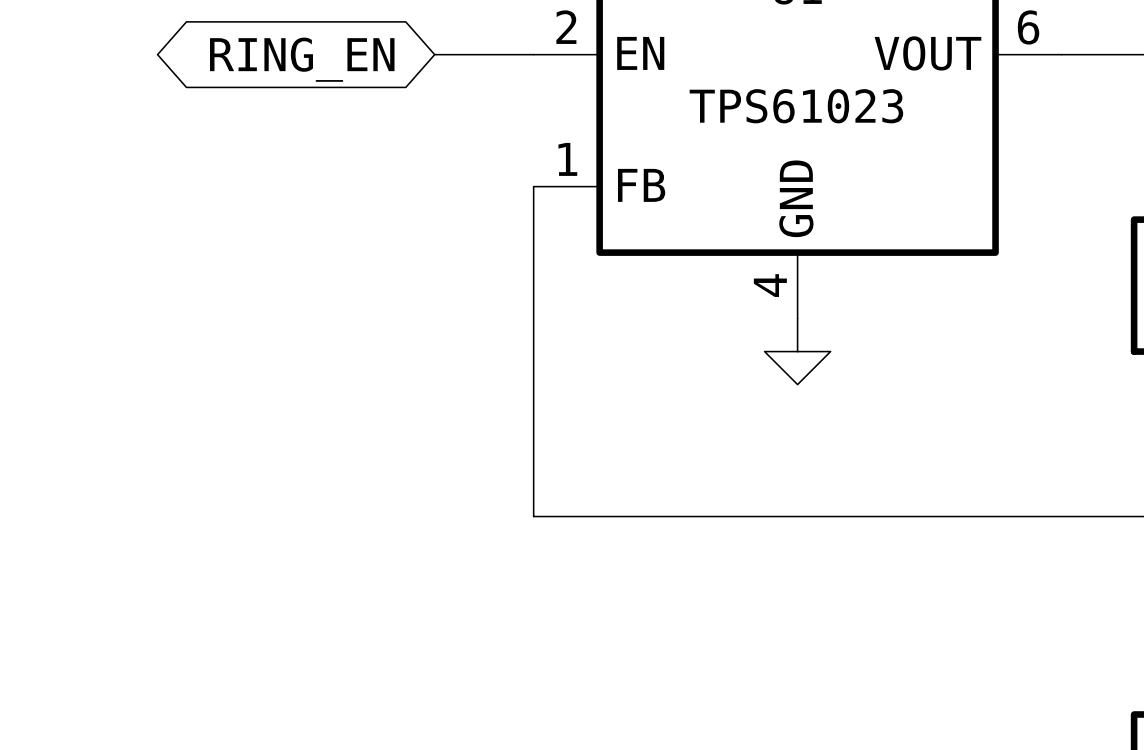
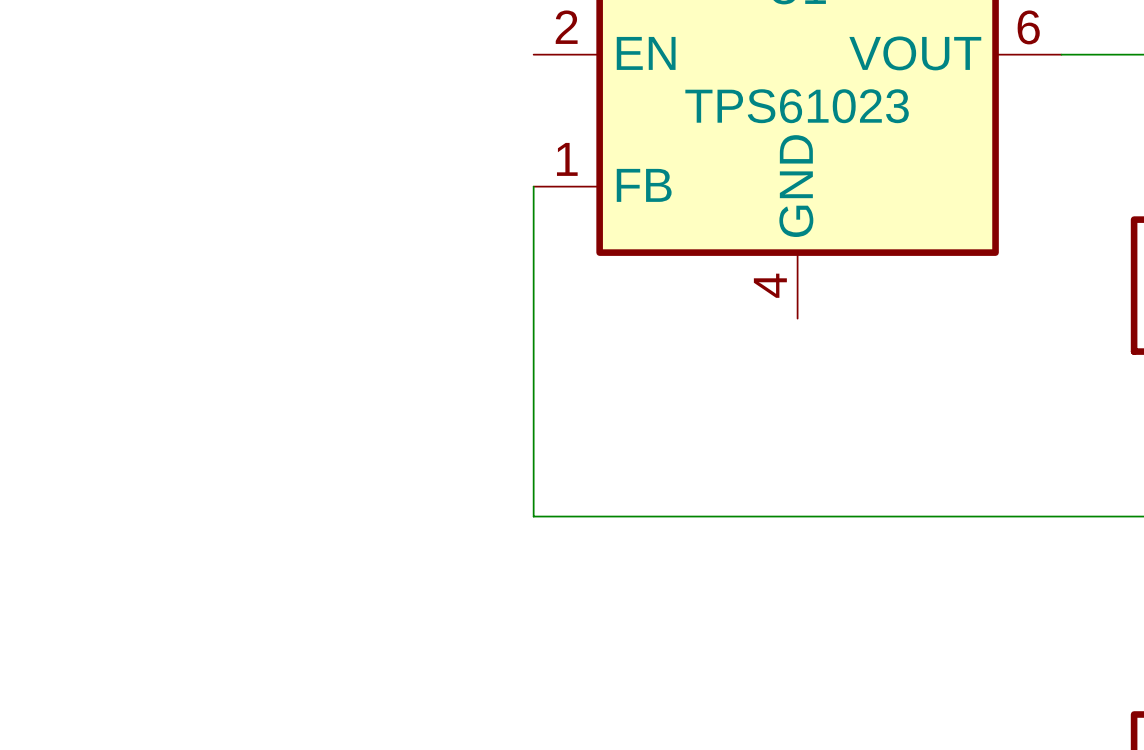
wire: (434, 54) (533, 54) -> none
global label: RING_EN (302, 59) -> none
power symbol: (797, 351) -> none

